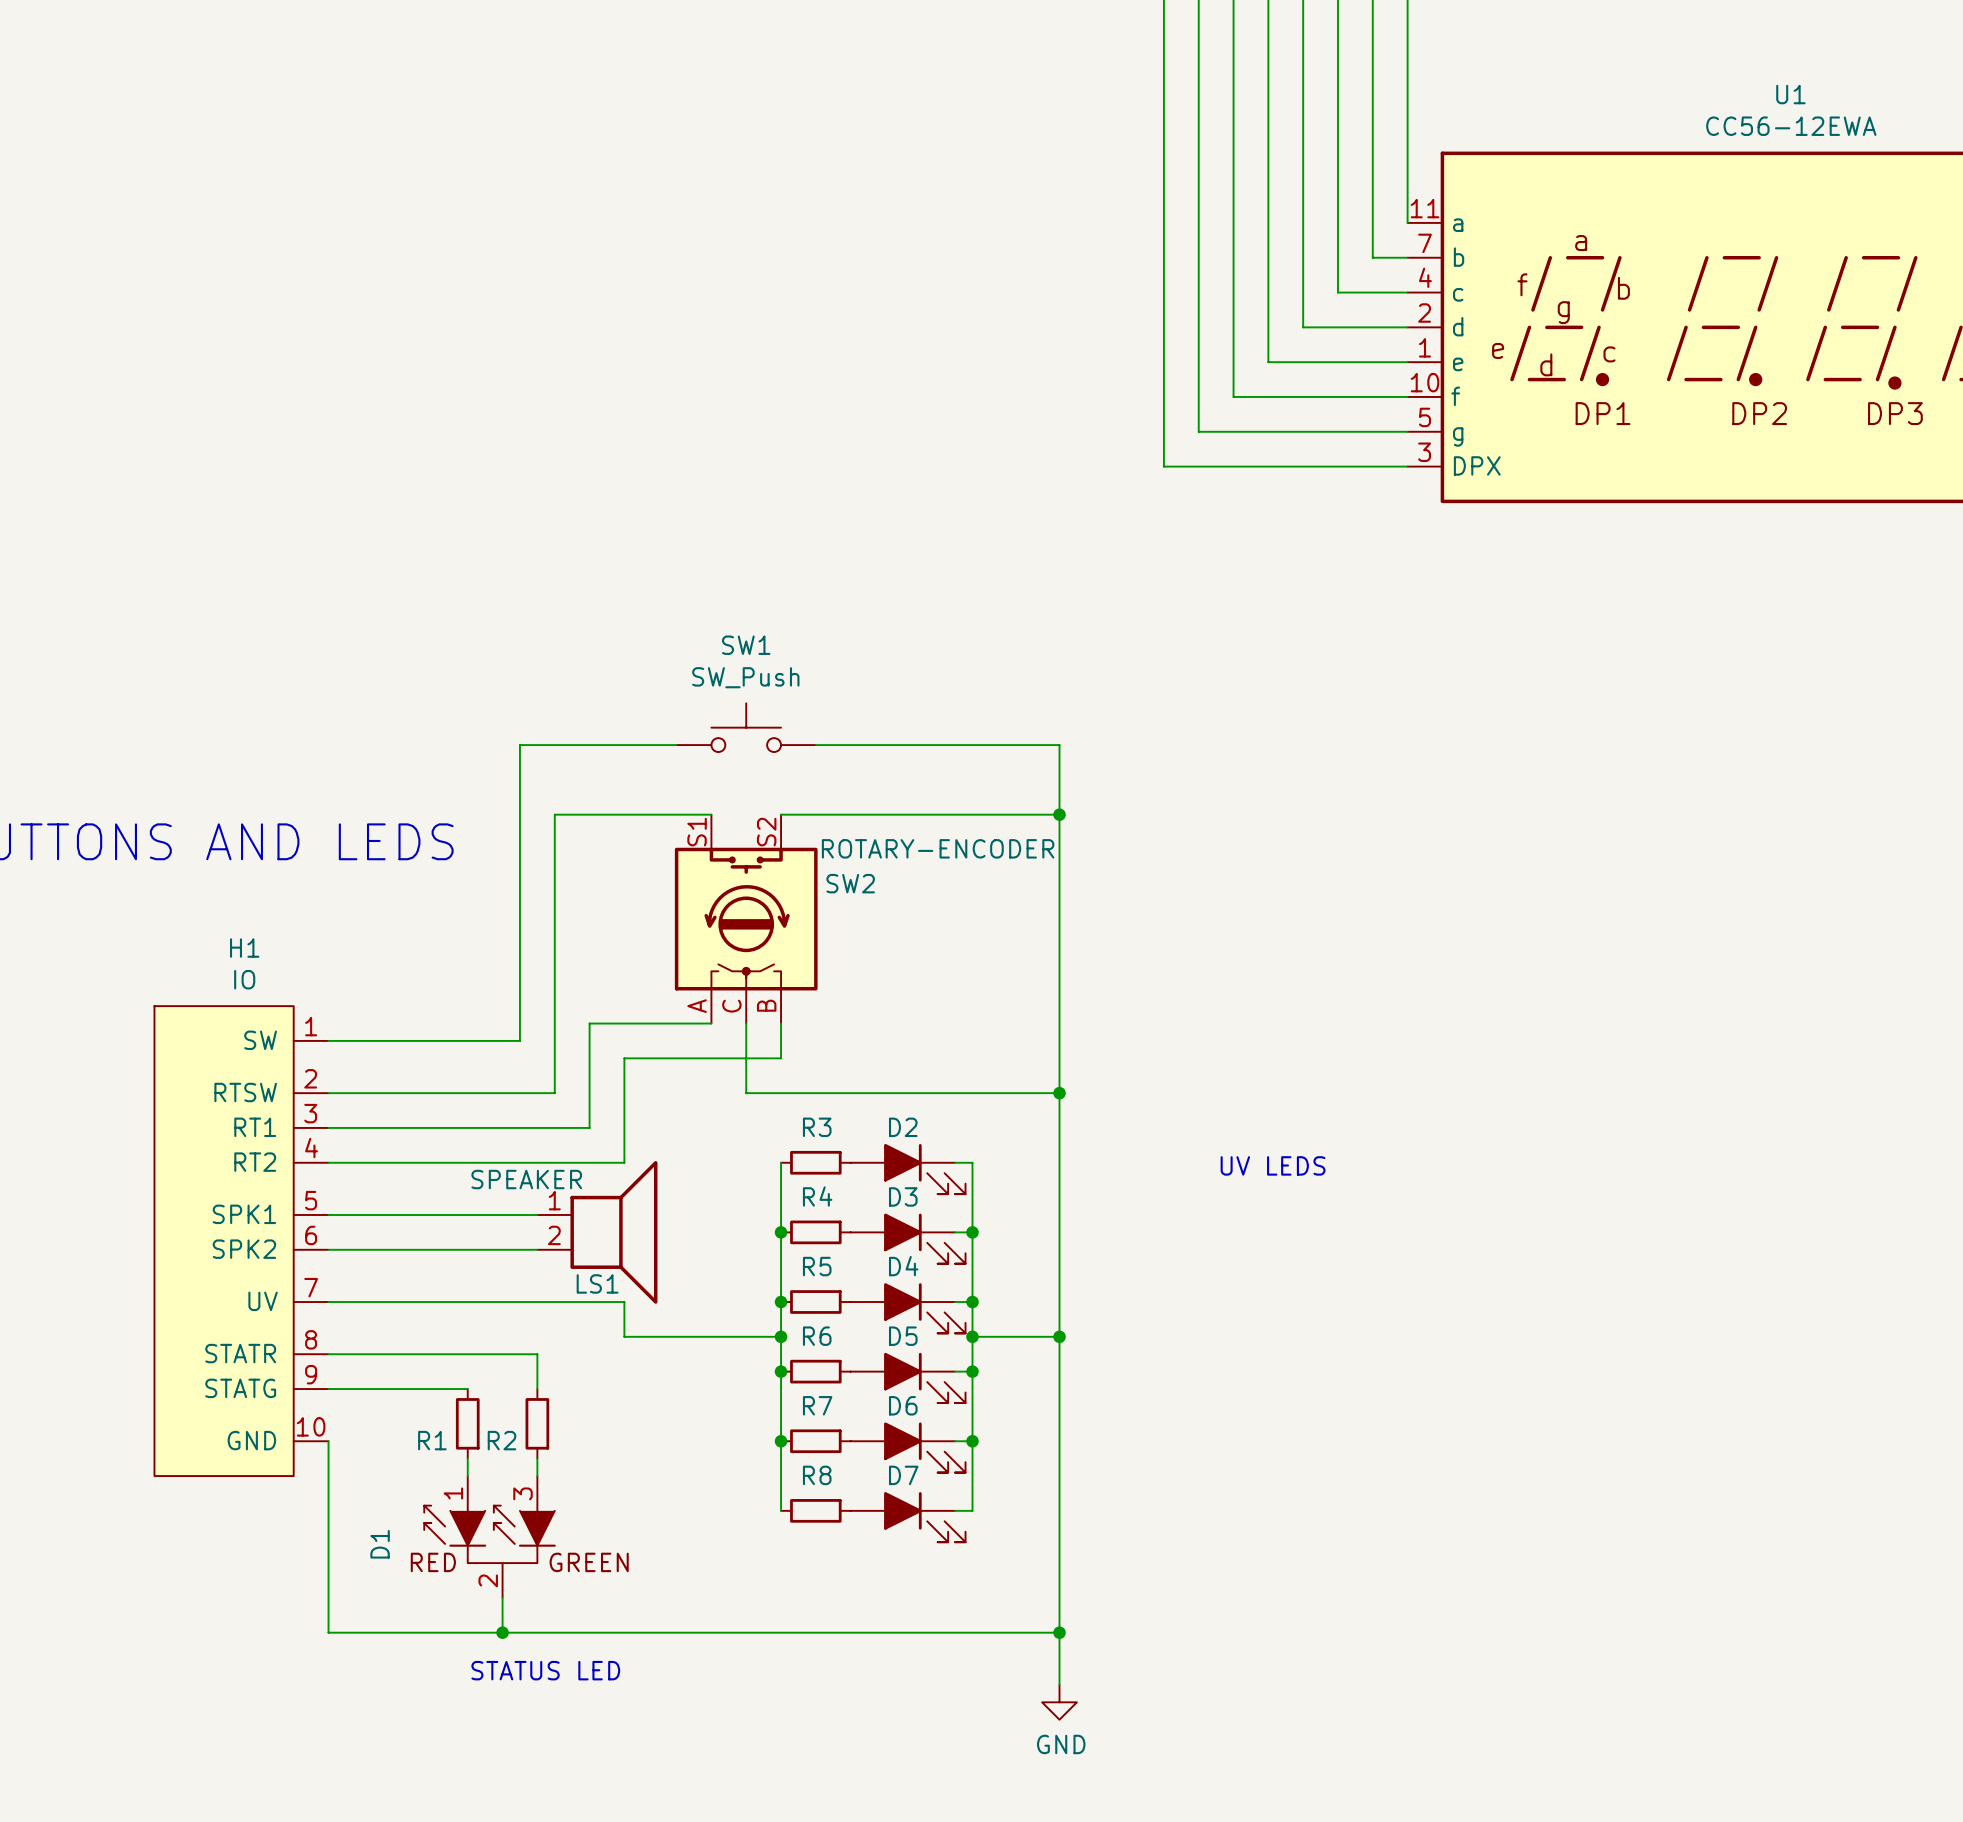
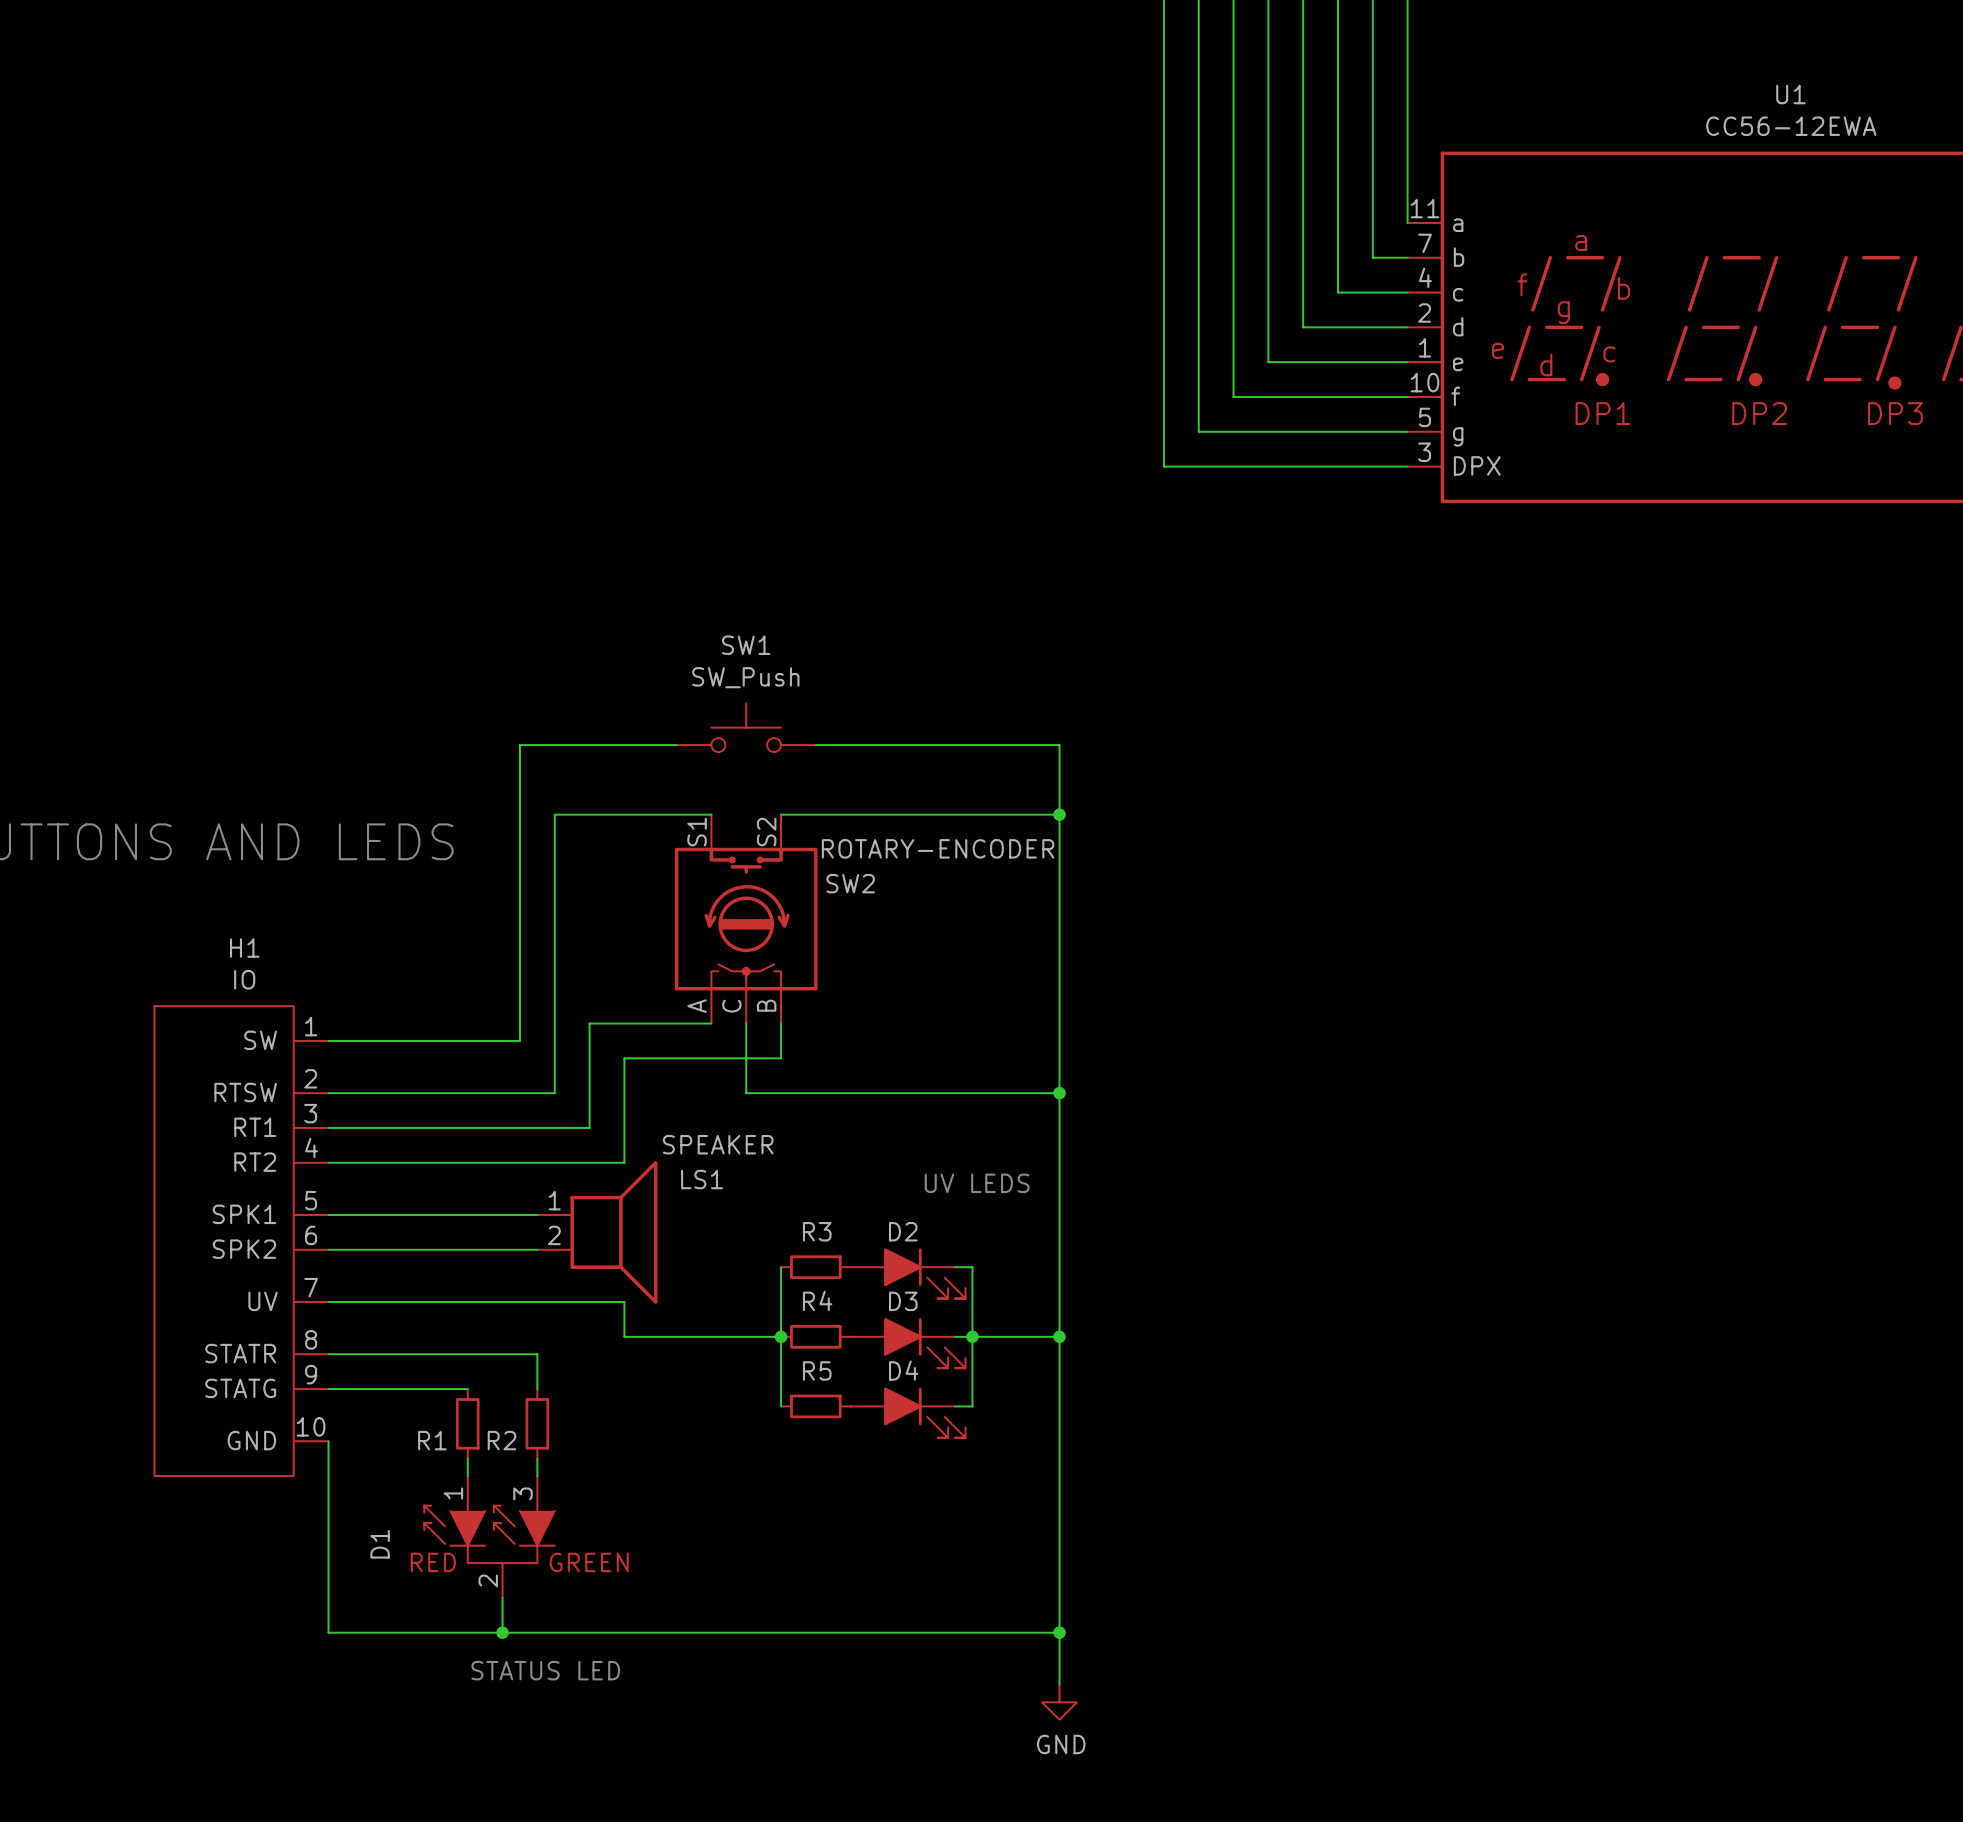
wire: (781, 1162) (781, 1267) -> none
R3 position: (815, 1162) -> (815, 1267)
wire: (955, 1162) (972, 1162) (972, 1267) -> (955, 1267) (972, 1267)
text position: UV LEDS (1273, 1165) -> UV LEDS (977, 1183)
D2 position: (908, 1169) -> (908, 1273)
LS1 value position: SPEAKER (526, 1179) -> SPEAKER (718, 1144)
junction: (781, 1232) -> none
R4 position: (815, 1232) -> (815, 1336)
wire: (955, 1232) (972, 1232) -> none
junction: (972, 1232) -> none
D3 position: (908, 1238) -> (908, 1343)
LS1 name position: LS1 (597, 1283) -> LS1 (702, 1179)
junction: (781, 1302) -> none
R5 position: (815, 1302) -> (815, 1406)
wire: (955, 1302) (972, 1302) -> (955, 1336) (972, 1336)
junction: (972, 1302) -> none
D4 position: (908, 1308) -> (908, 1412)
junction: (781, 1371) -> none
R6: (815, 1371) -> none
wire: (955, 1371) (972, 1371) -> none
junction: (972, 1371) -> none
D5: (908, 1377) -> none
wire: (781, 1406) (781, 1510) -> none
wire: (972, 1406) (972, 1510) (955, 1510) -> (972, 1406) (955, 1406)
junction: (781, 1441) -> none
R7: (815, 1441) -> none
wire: (955, 1441) (972, 1441) -> none
junction: (972, 1441) -> none
D6: (908, 1447) -> none
R8: (815, 1510) -> none
D7: (908, 1517) -> none

